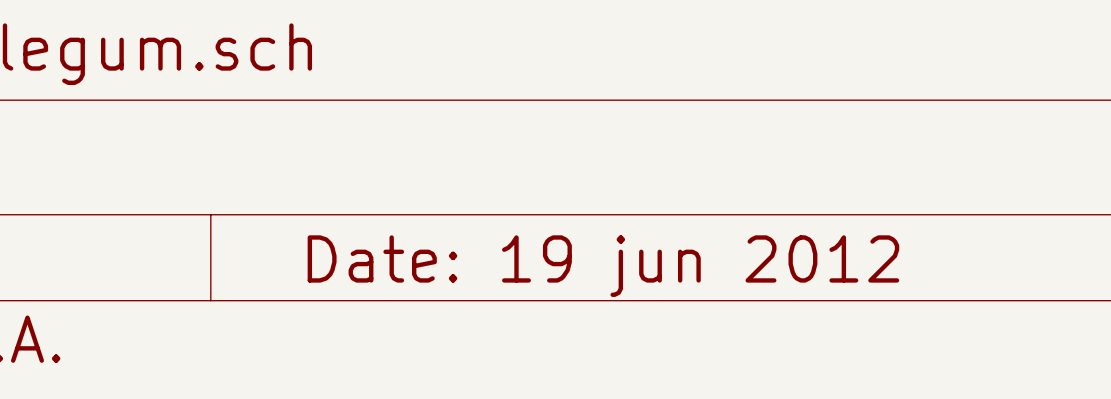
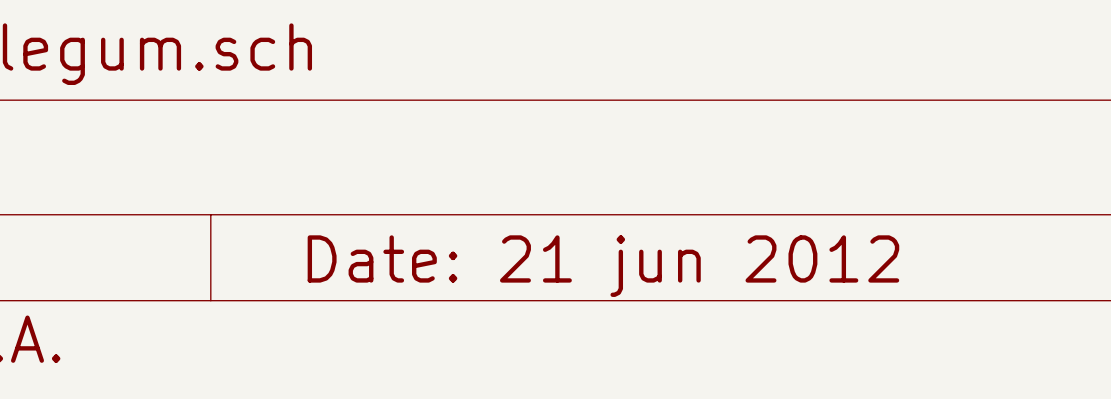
title block: Date: 19 jun 2012 (603, 266) -> Date: 21 jun 2012 (603, 266)

